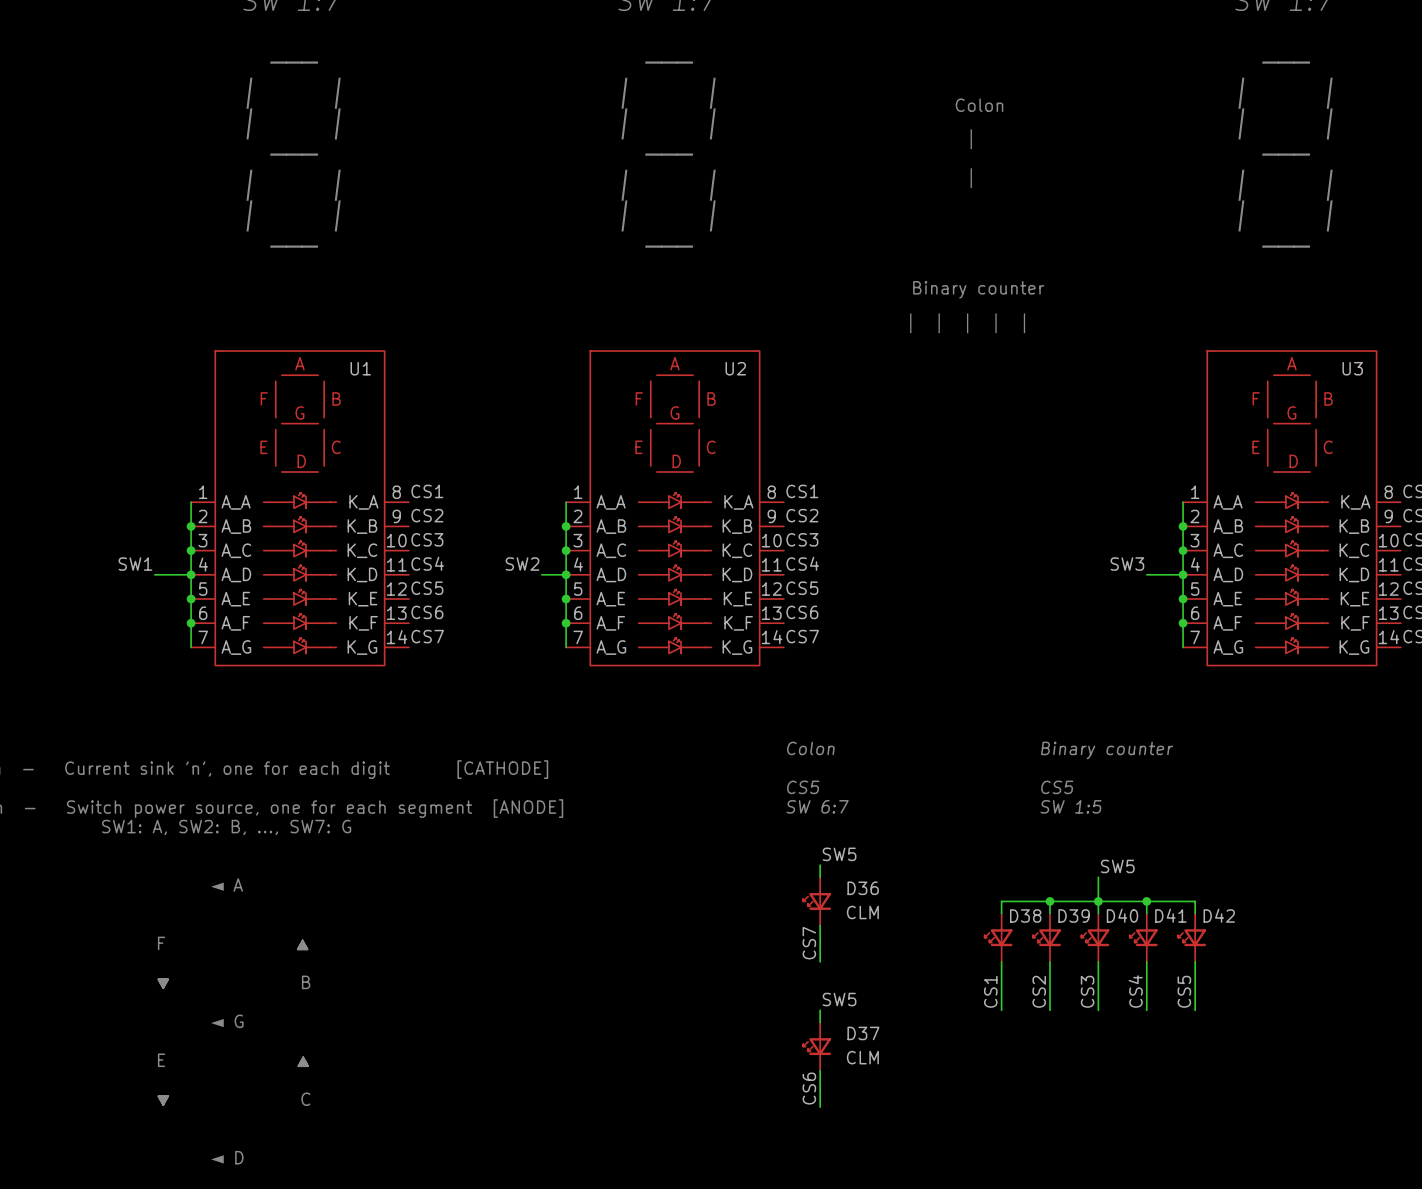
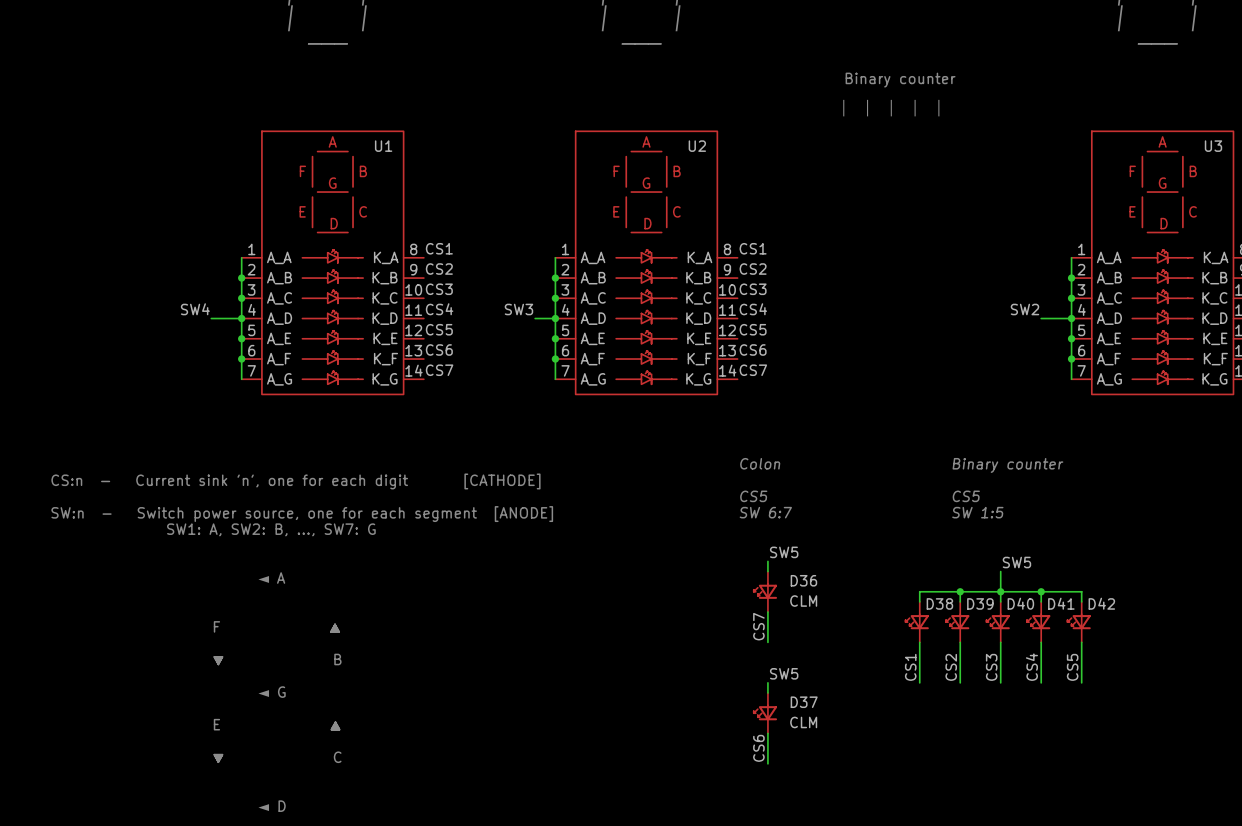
label: SW1 (135, 564) -> SW4 (195, 309)
label: SW2 (522, 564) -> SW3 (518, 309)
label: SW3 (1127, 564) -> SW2 (1024, 309)

